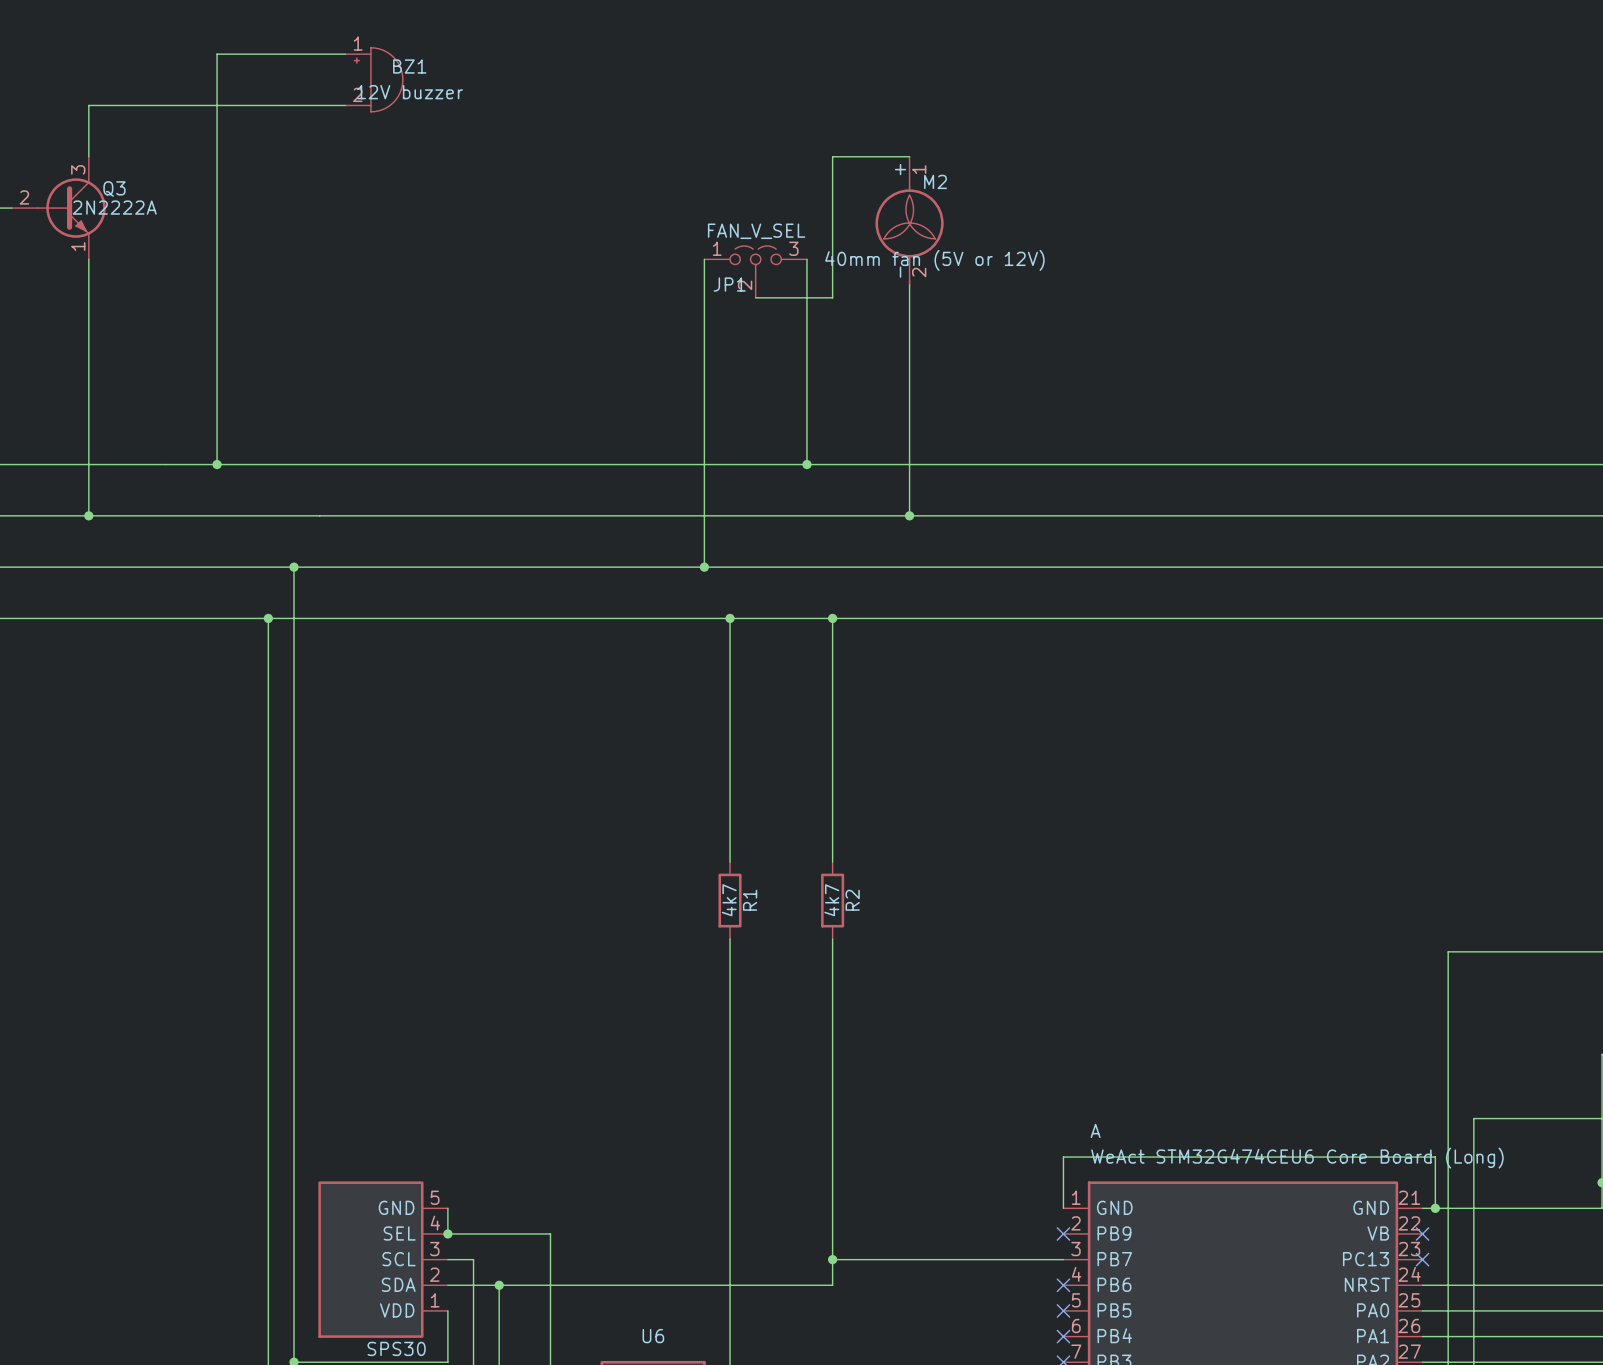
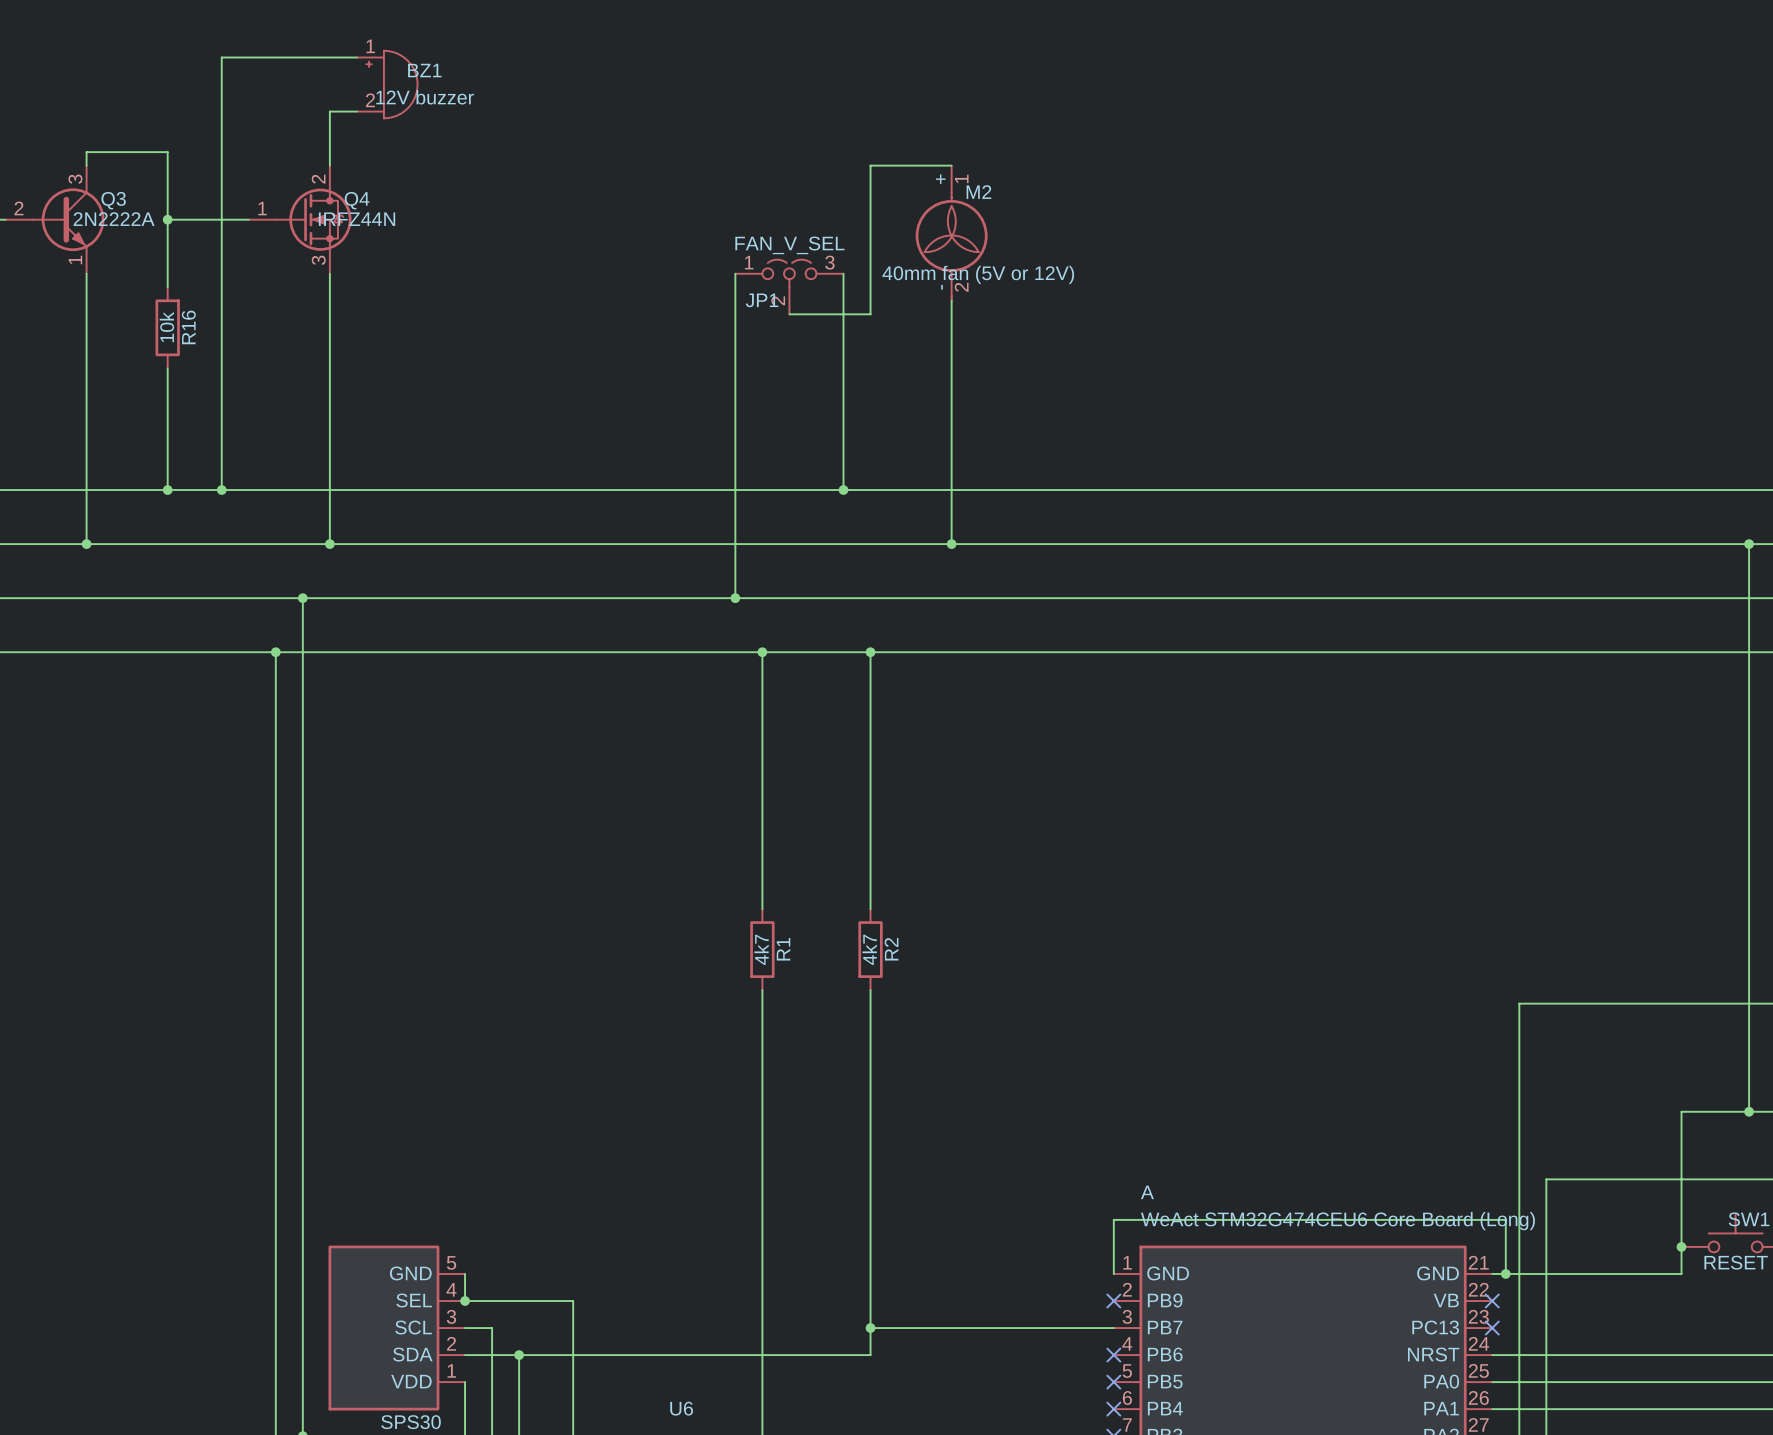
wire: (319, 105) (88, 105) (88, 143) -> (167, 287) (167, 152) (86, 152)
wire: none -> (329, 111) (329, 165)
wire: none -> (167, 219) (248, 219)
junction: none -> (167, 219)
Q4: none -> IRFZ44N (300, 219)
wire: none -> (329, 273) (329, 544)
R16: none -> 10k (167, 327)
wire: none -> (167, 368) (167, 490)
junction: none -> (167, 490)
junction: none -> (329, 544)

